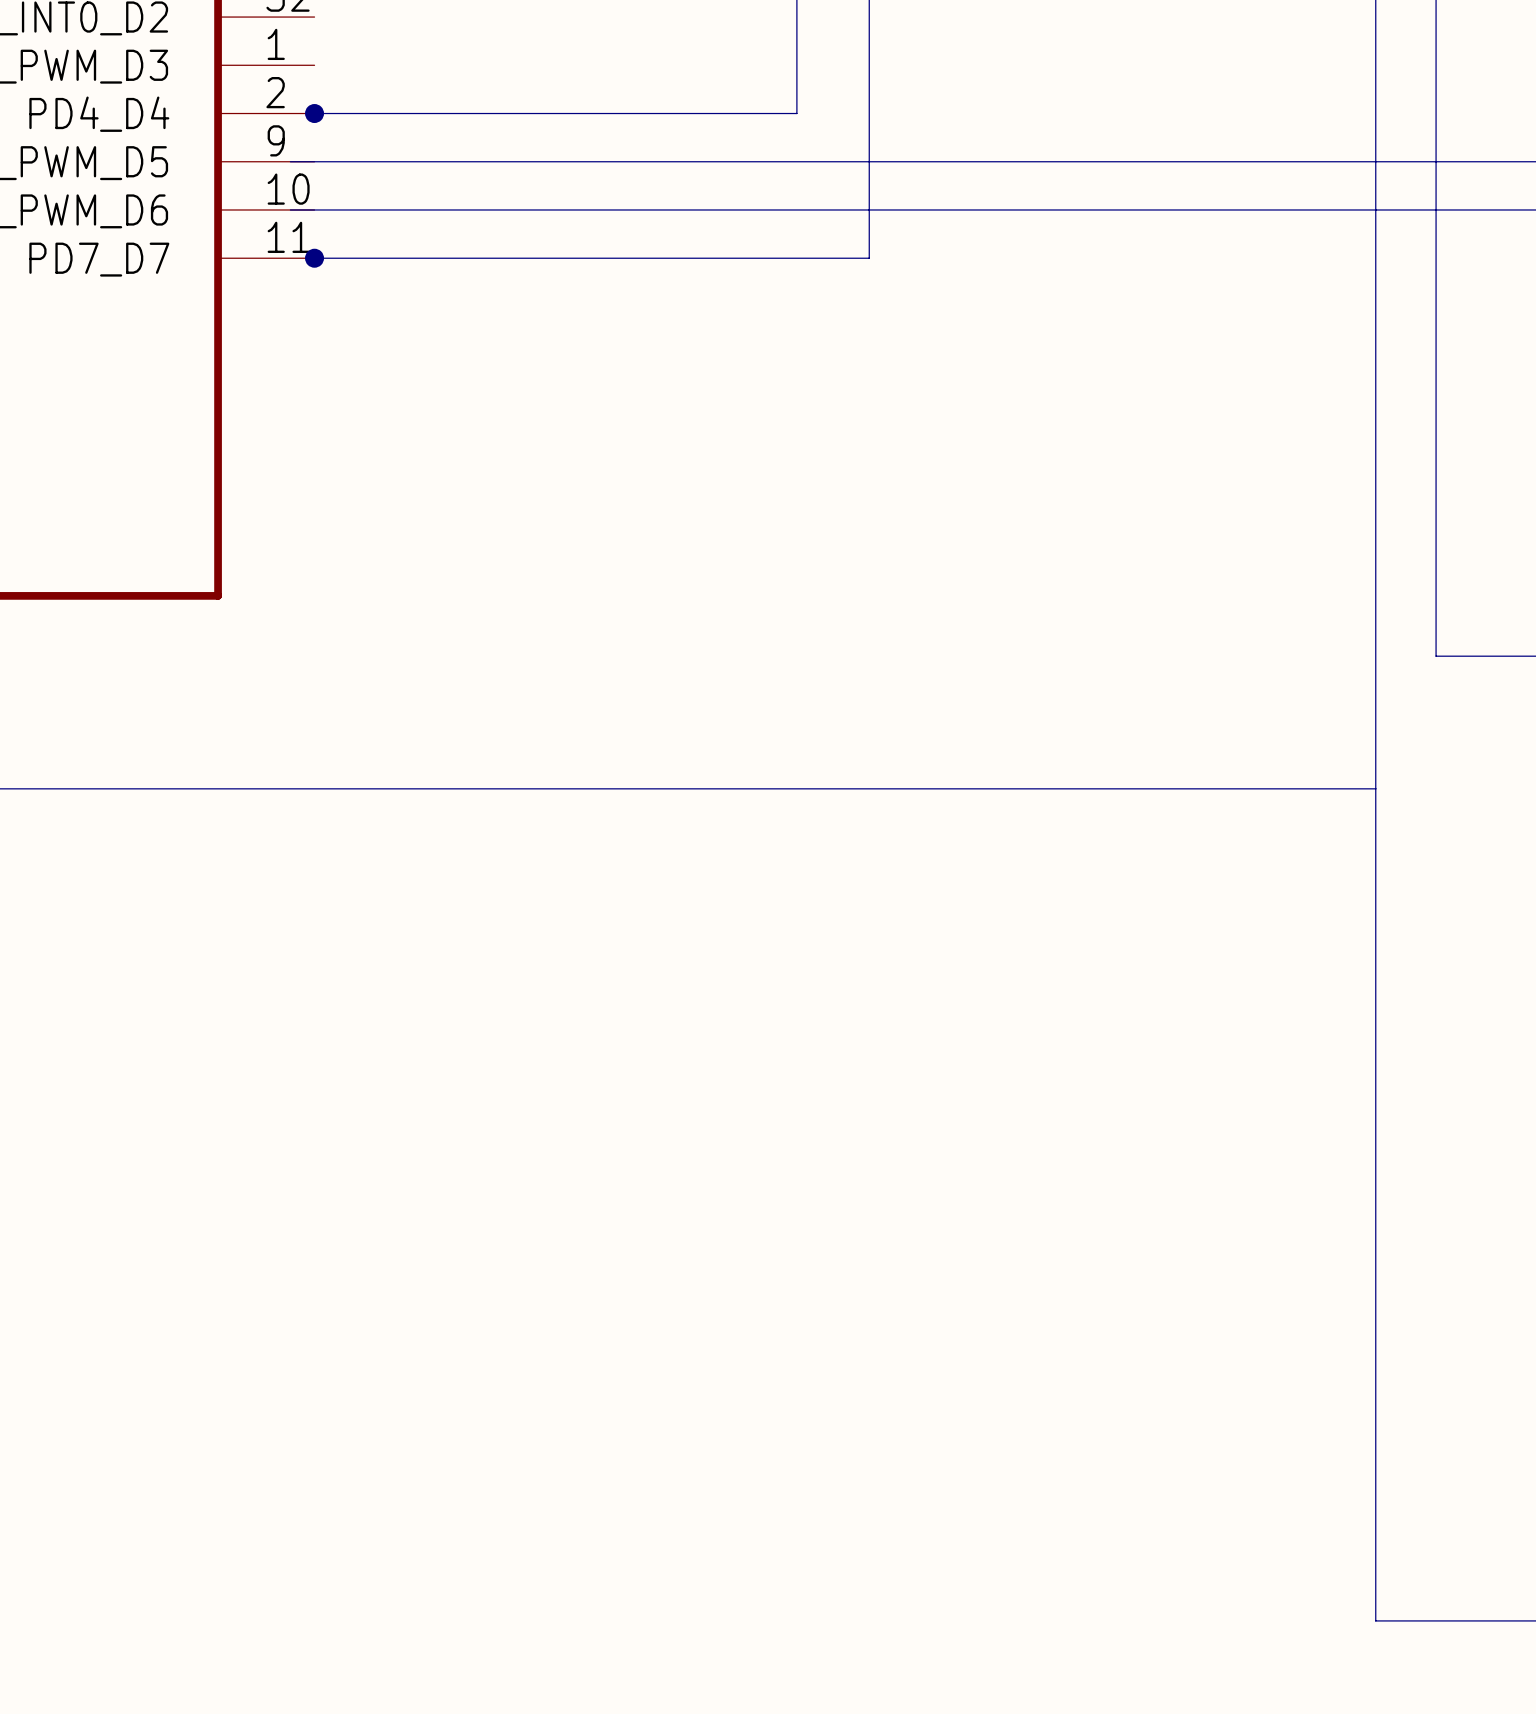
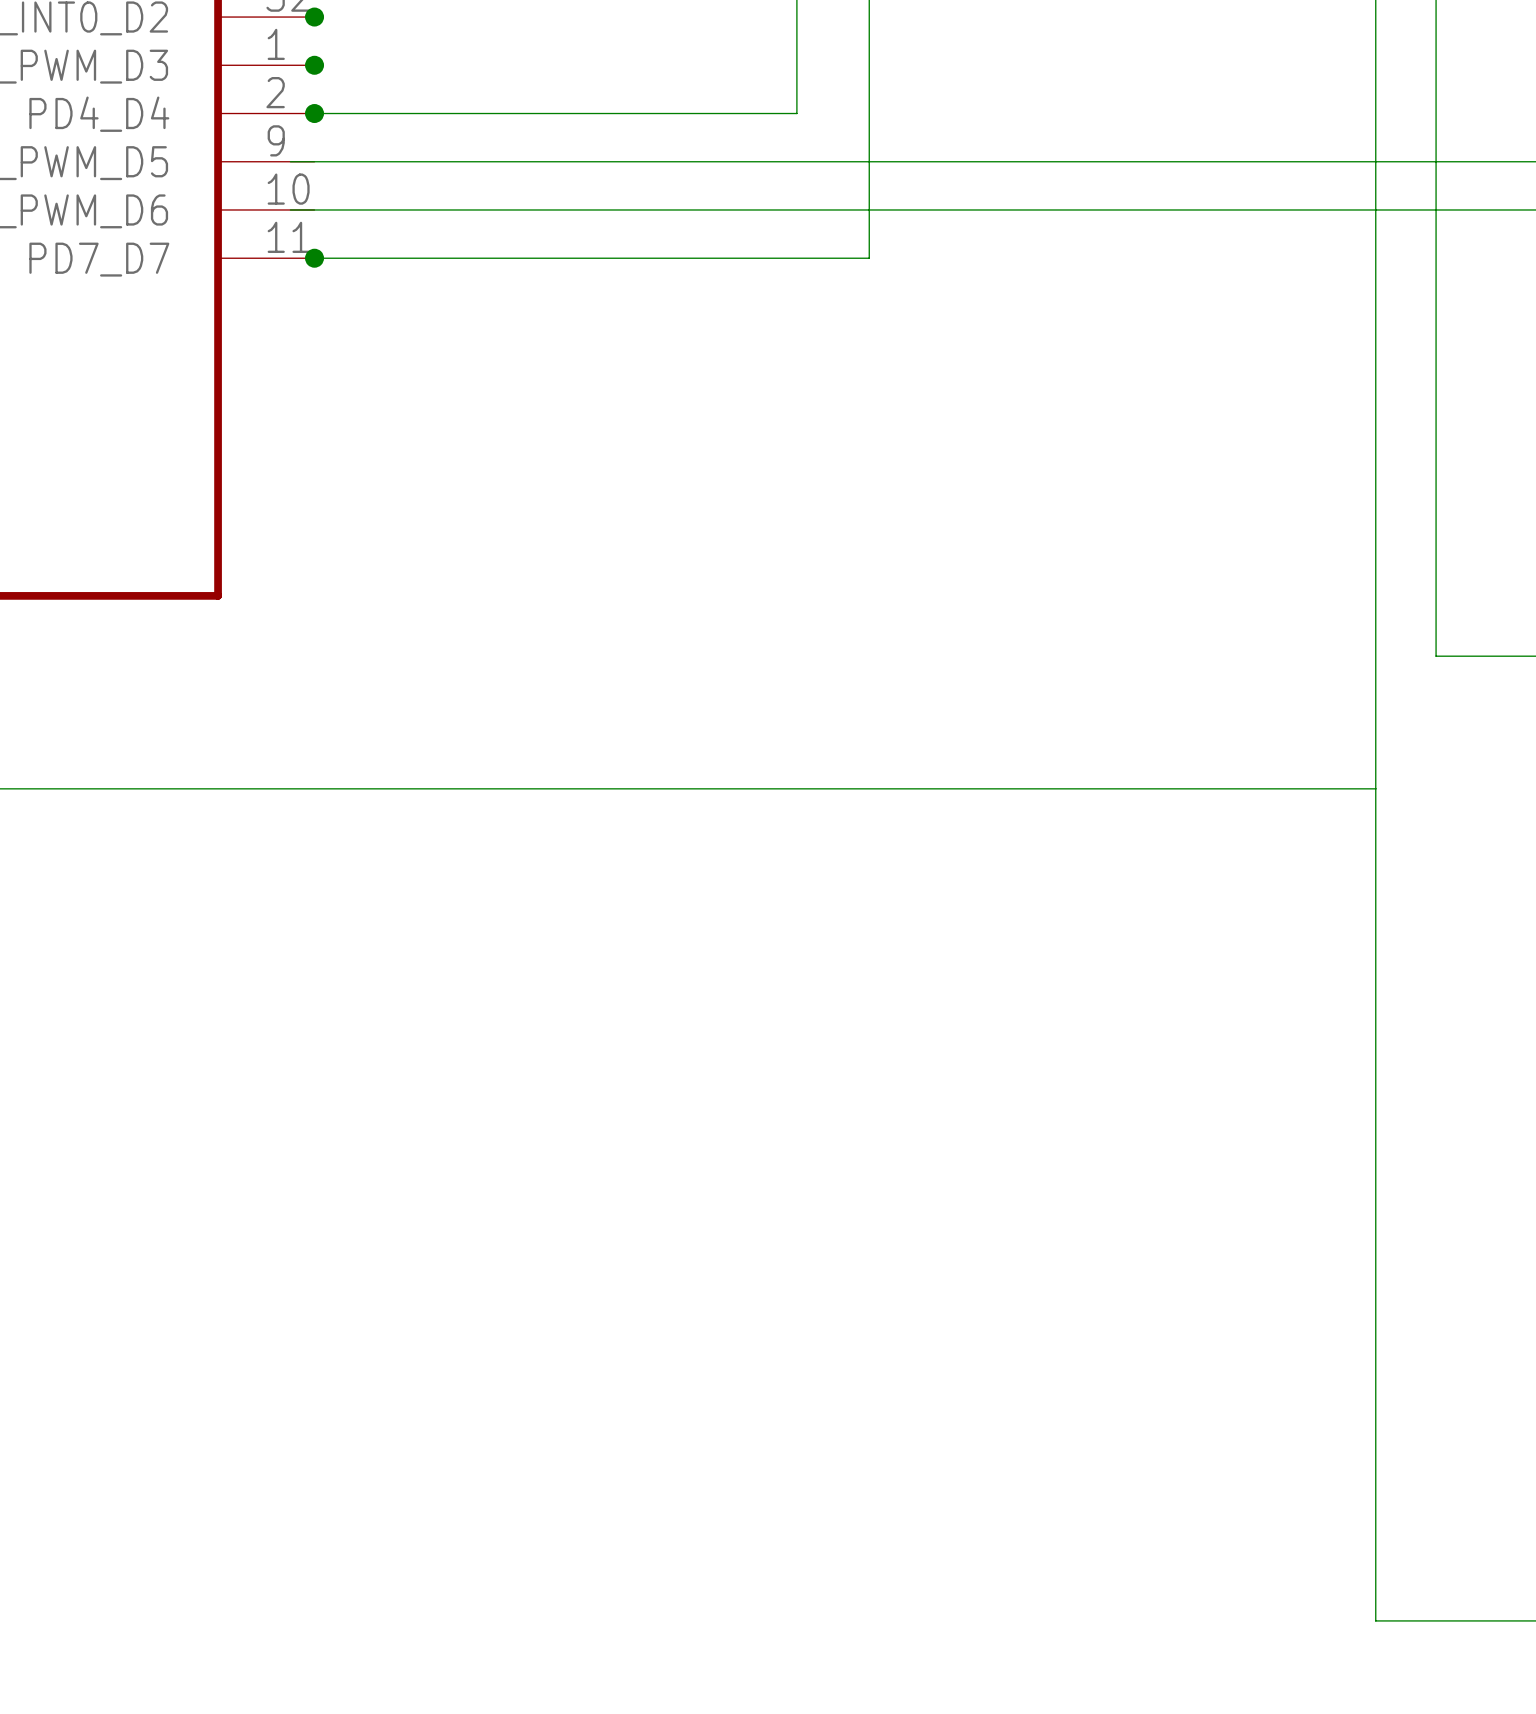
junction: none -> (314, 17)
junction: none -> (314, 65)

